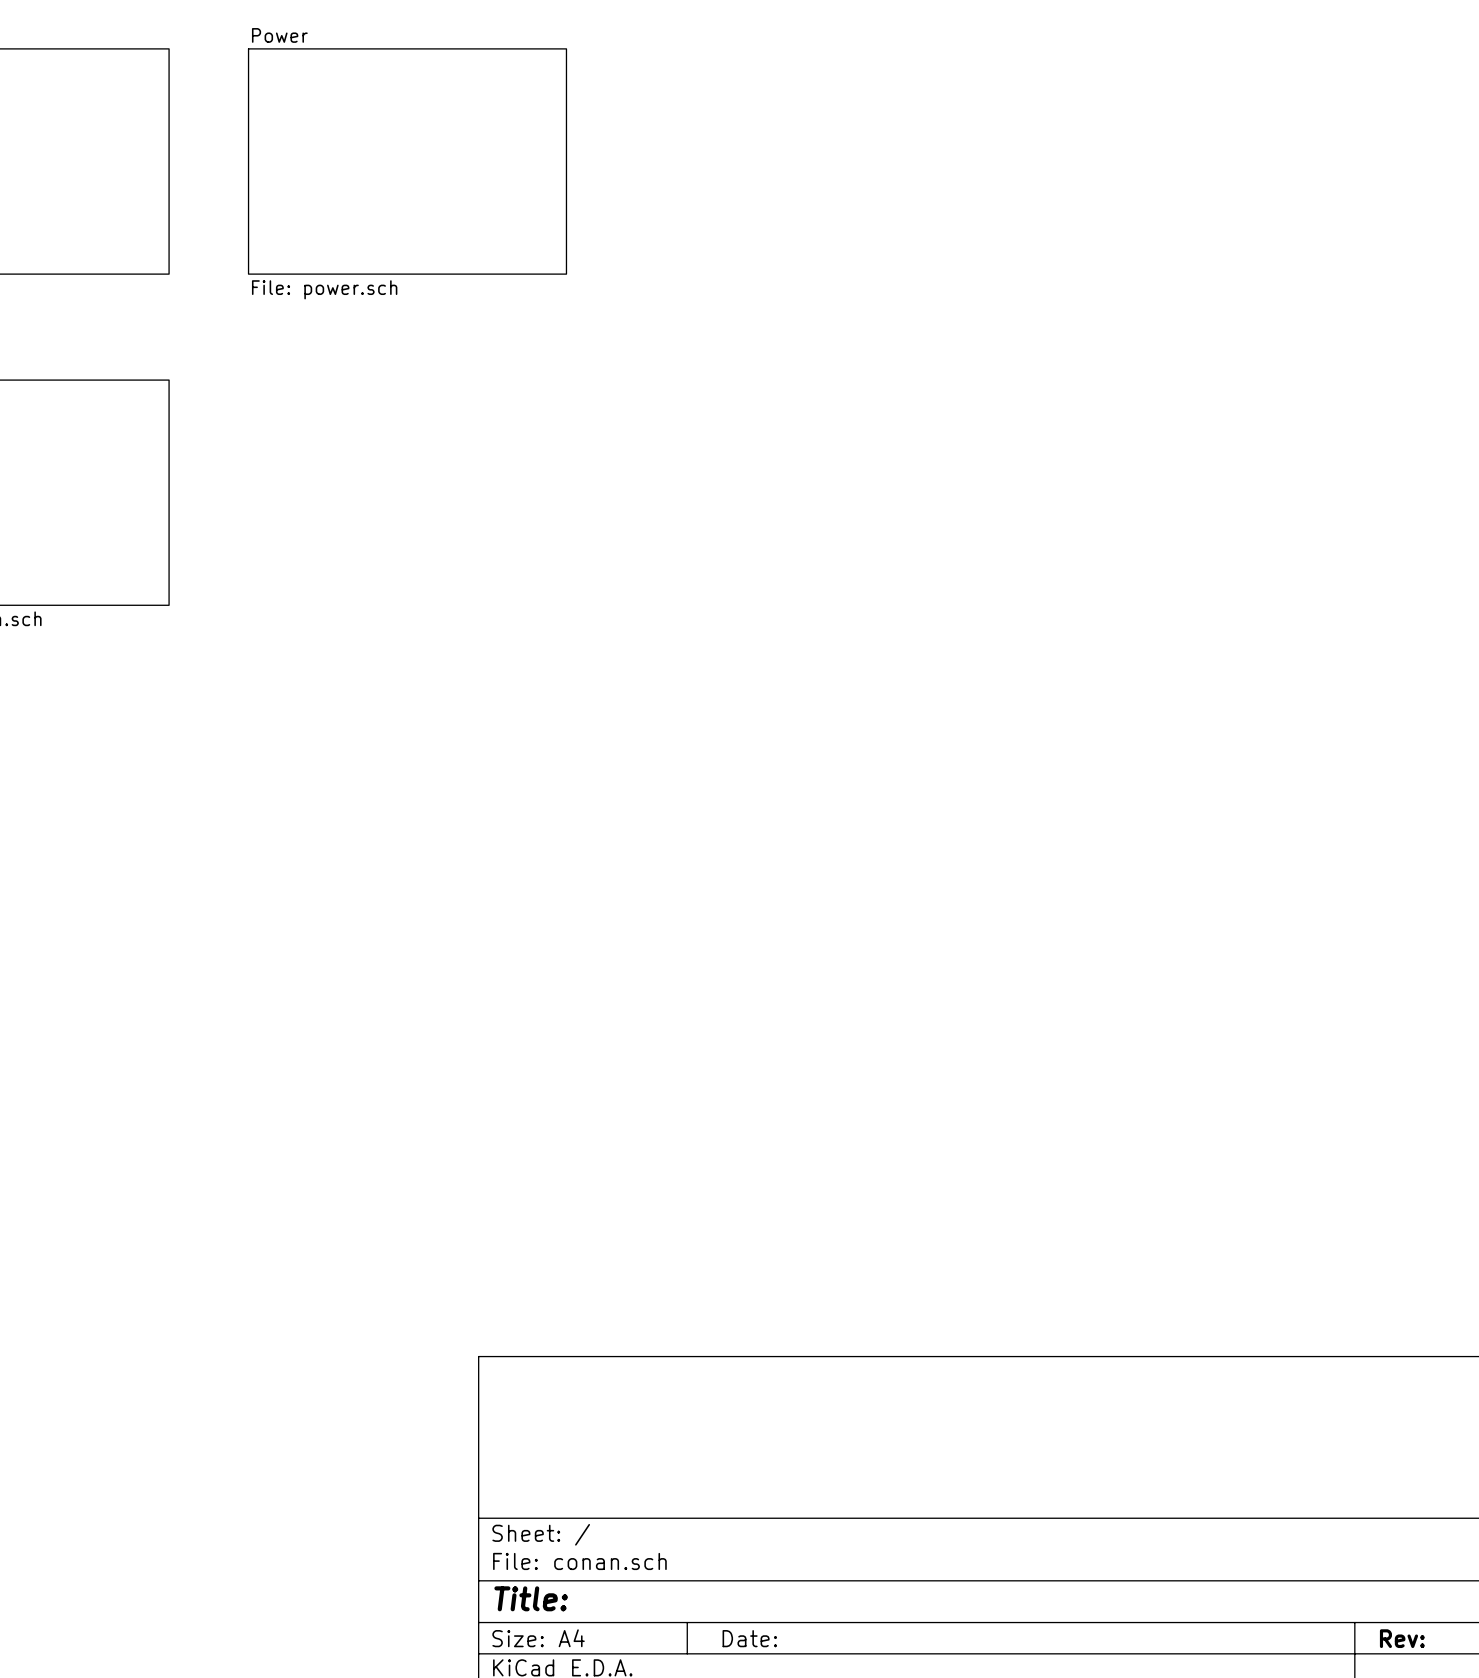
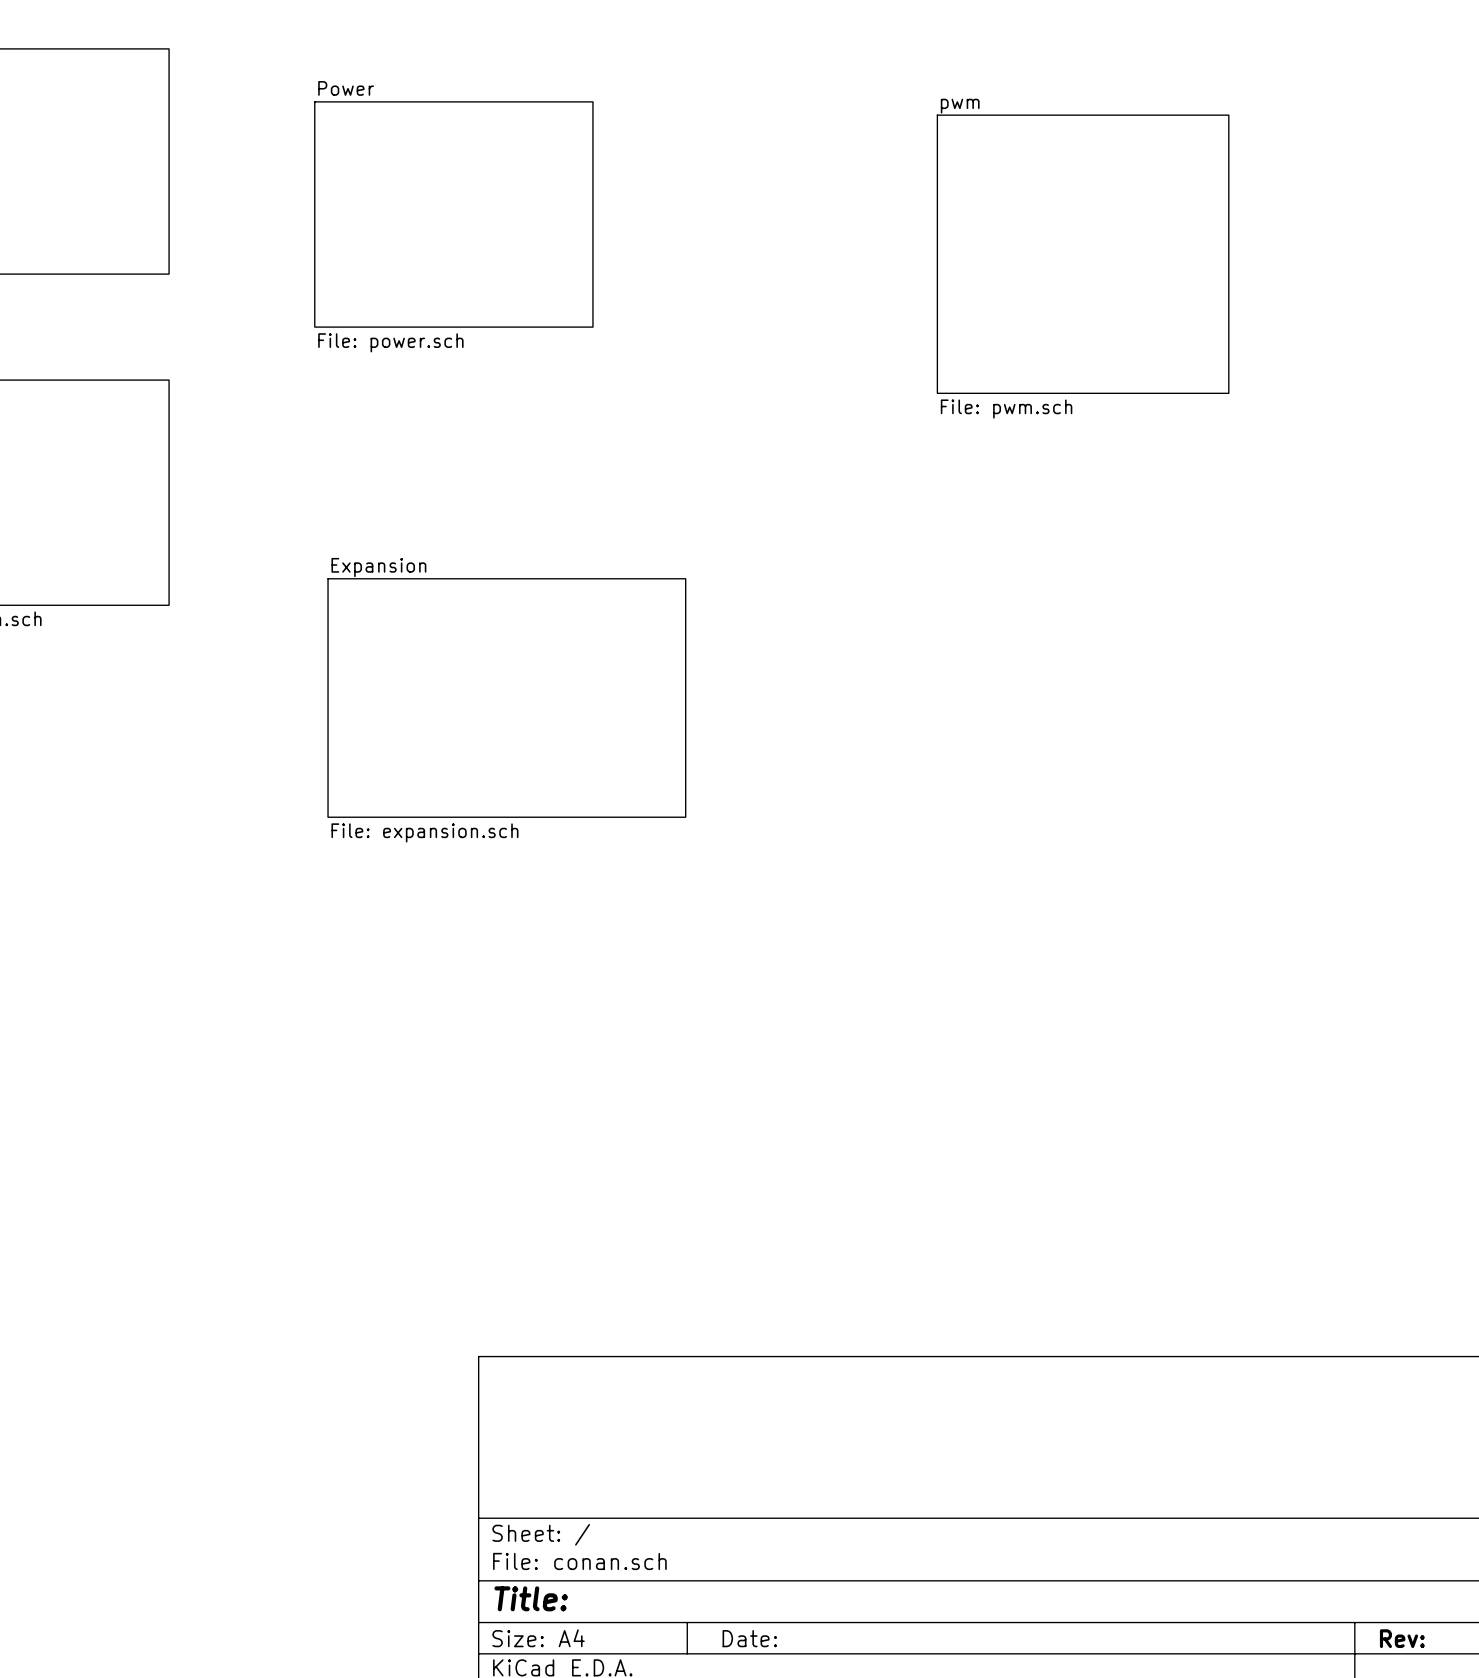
sheet Power: File: power.sch (407, 161) -> none
sheet Power: none -> File: power.sch (453, 214)
sheet pwm: none -> File: pwm.sch (1083, 254)
sheet Expansion: none -> File: expansion.sch (506, 698)

